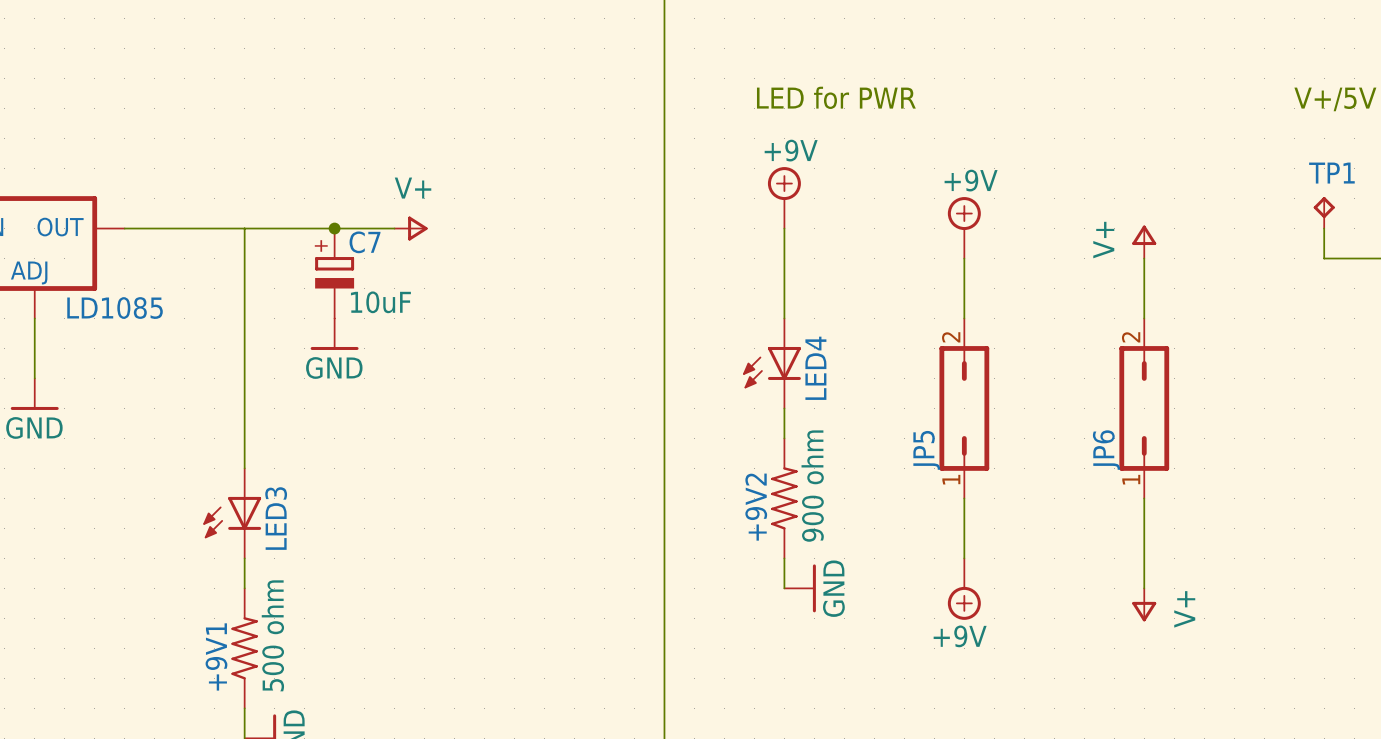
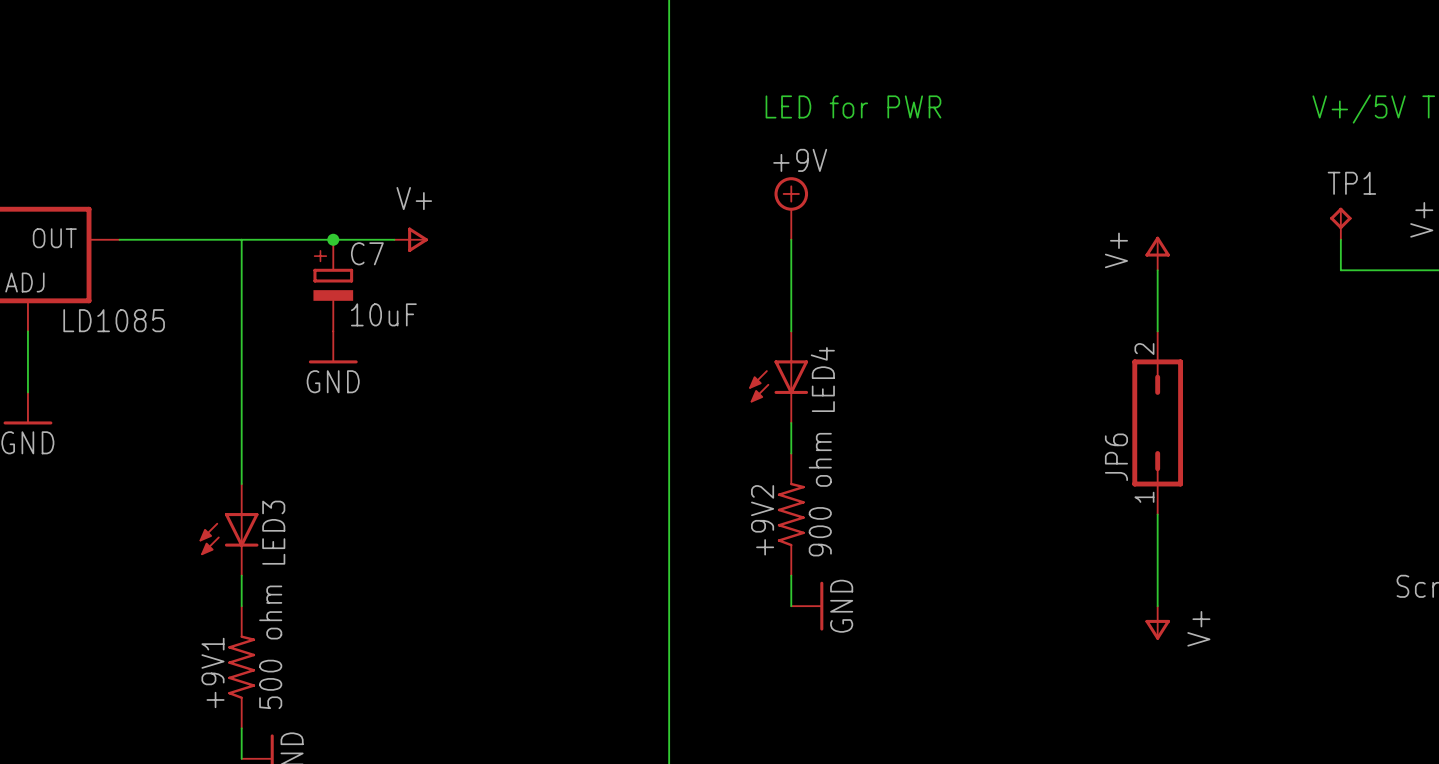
power symbol: +9V (964, 227) -> none
wire: (964, 258) (964, 318) -> none
JP5: (964, 408) -> none
wire: (964, 498) (964, 558) -> none
power symbol: +9V (964, 589) -> none

